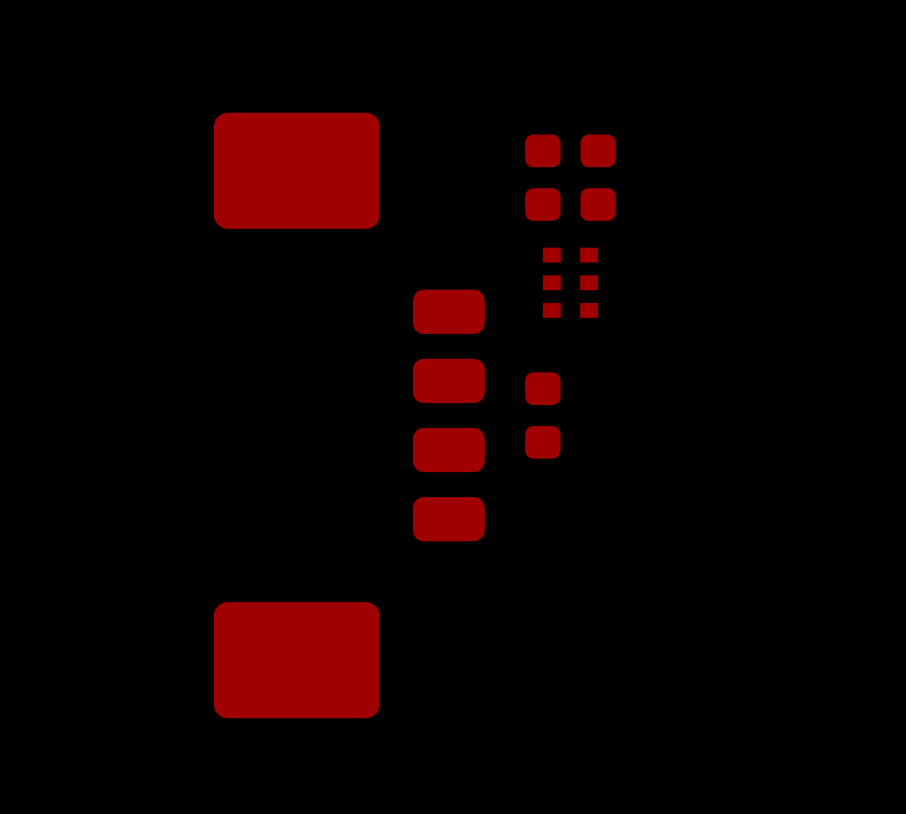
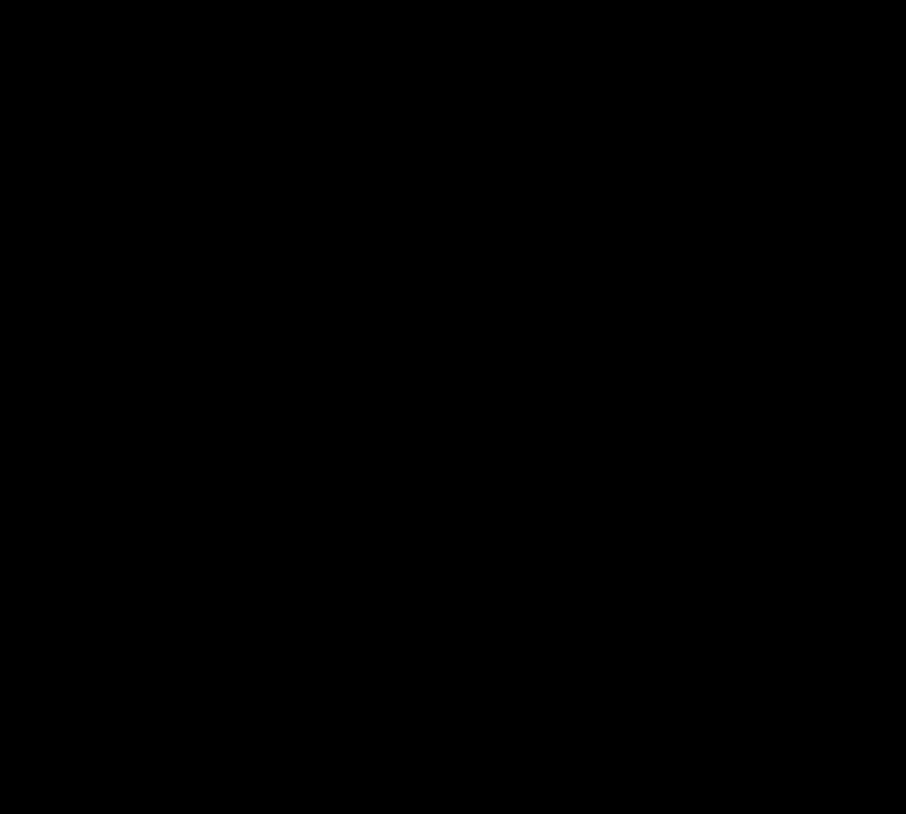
part: (542, 177) -> none
part: (598, 177) -> none
part: (570, 282) -> none
part: (349, 415) -> none
part: (542, 415) -> none

